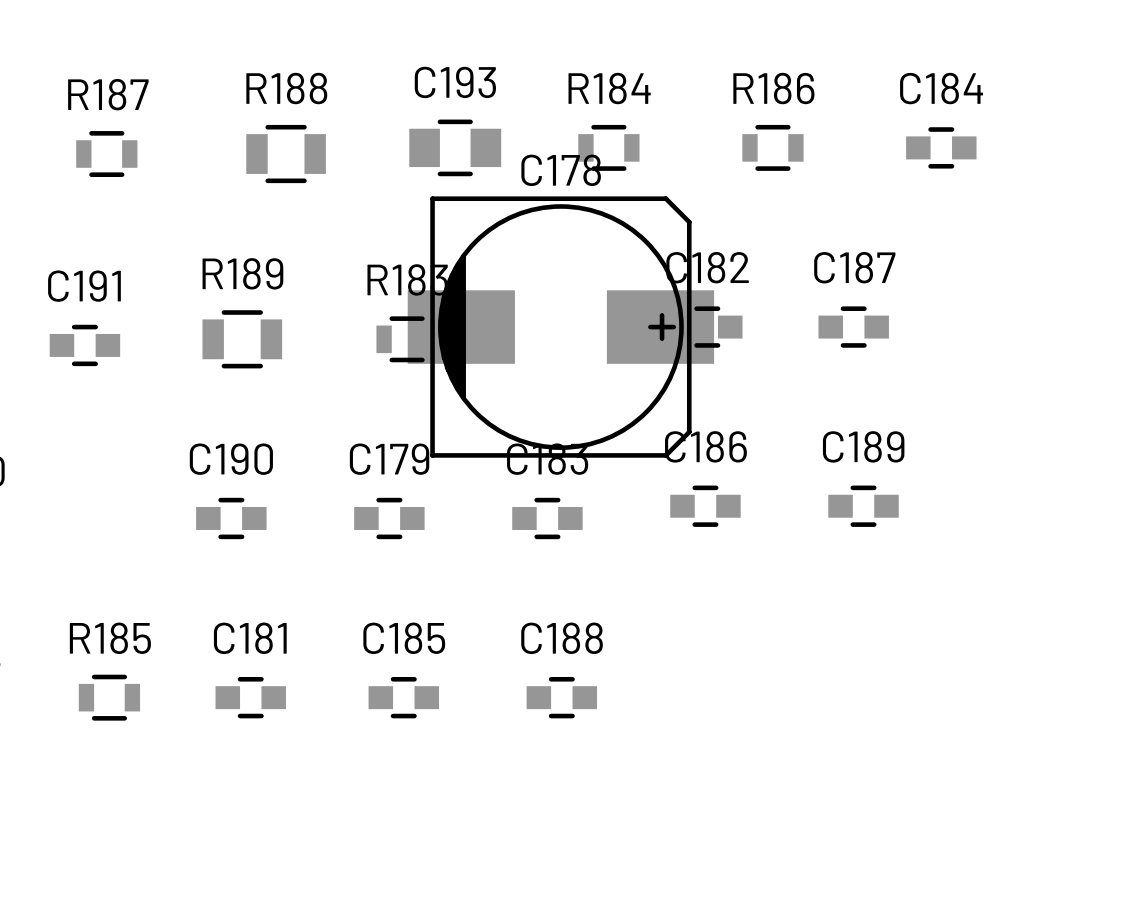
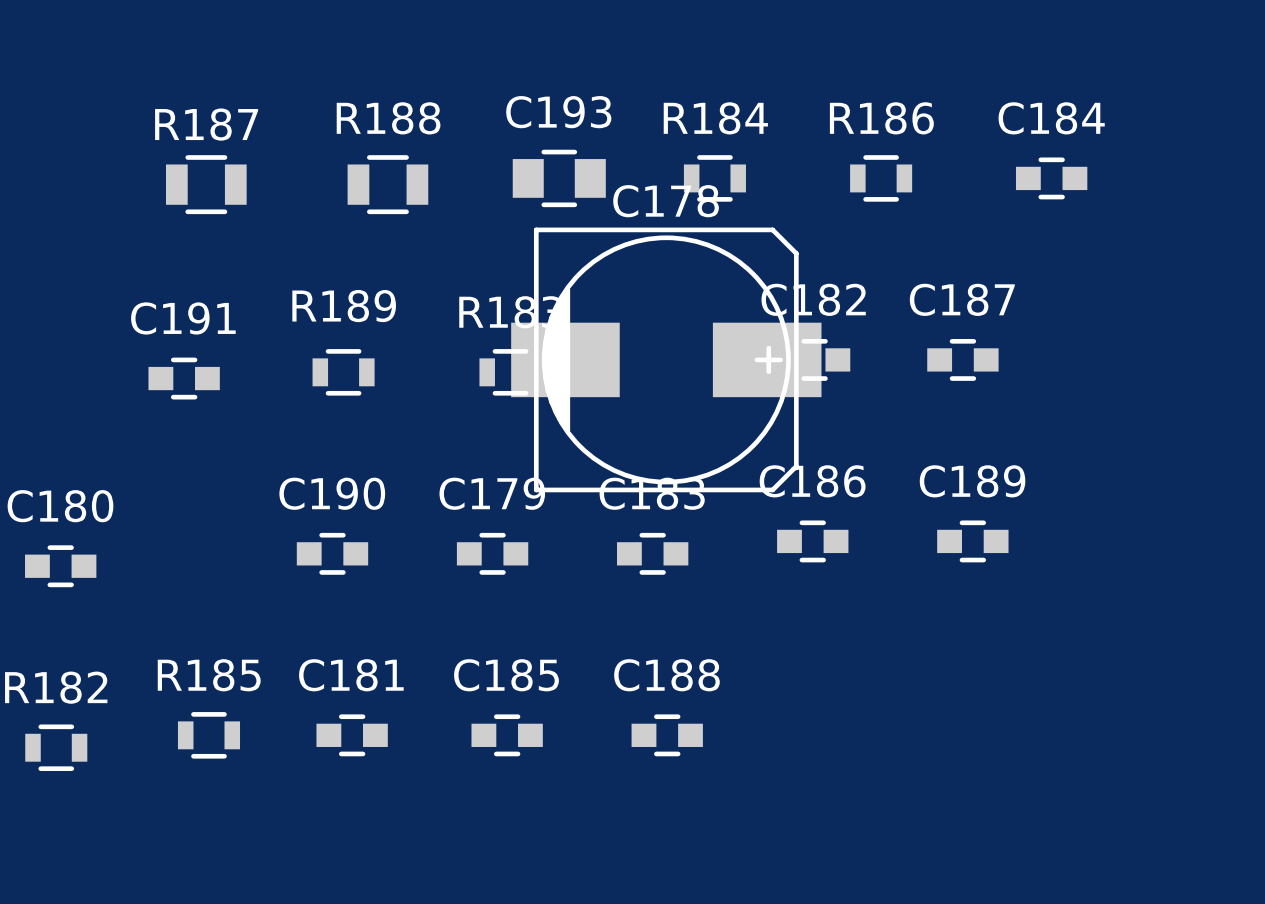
R187 footprint: [76, 131, 138, 177] -> [165, 155, 247, 215]
R189 footprint: [202, 310, 283, 369] -> [312, 349, 375, 396]

